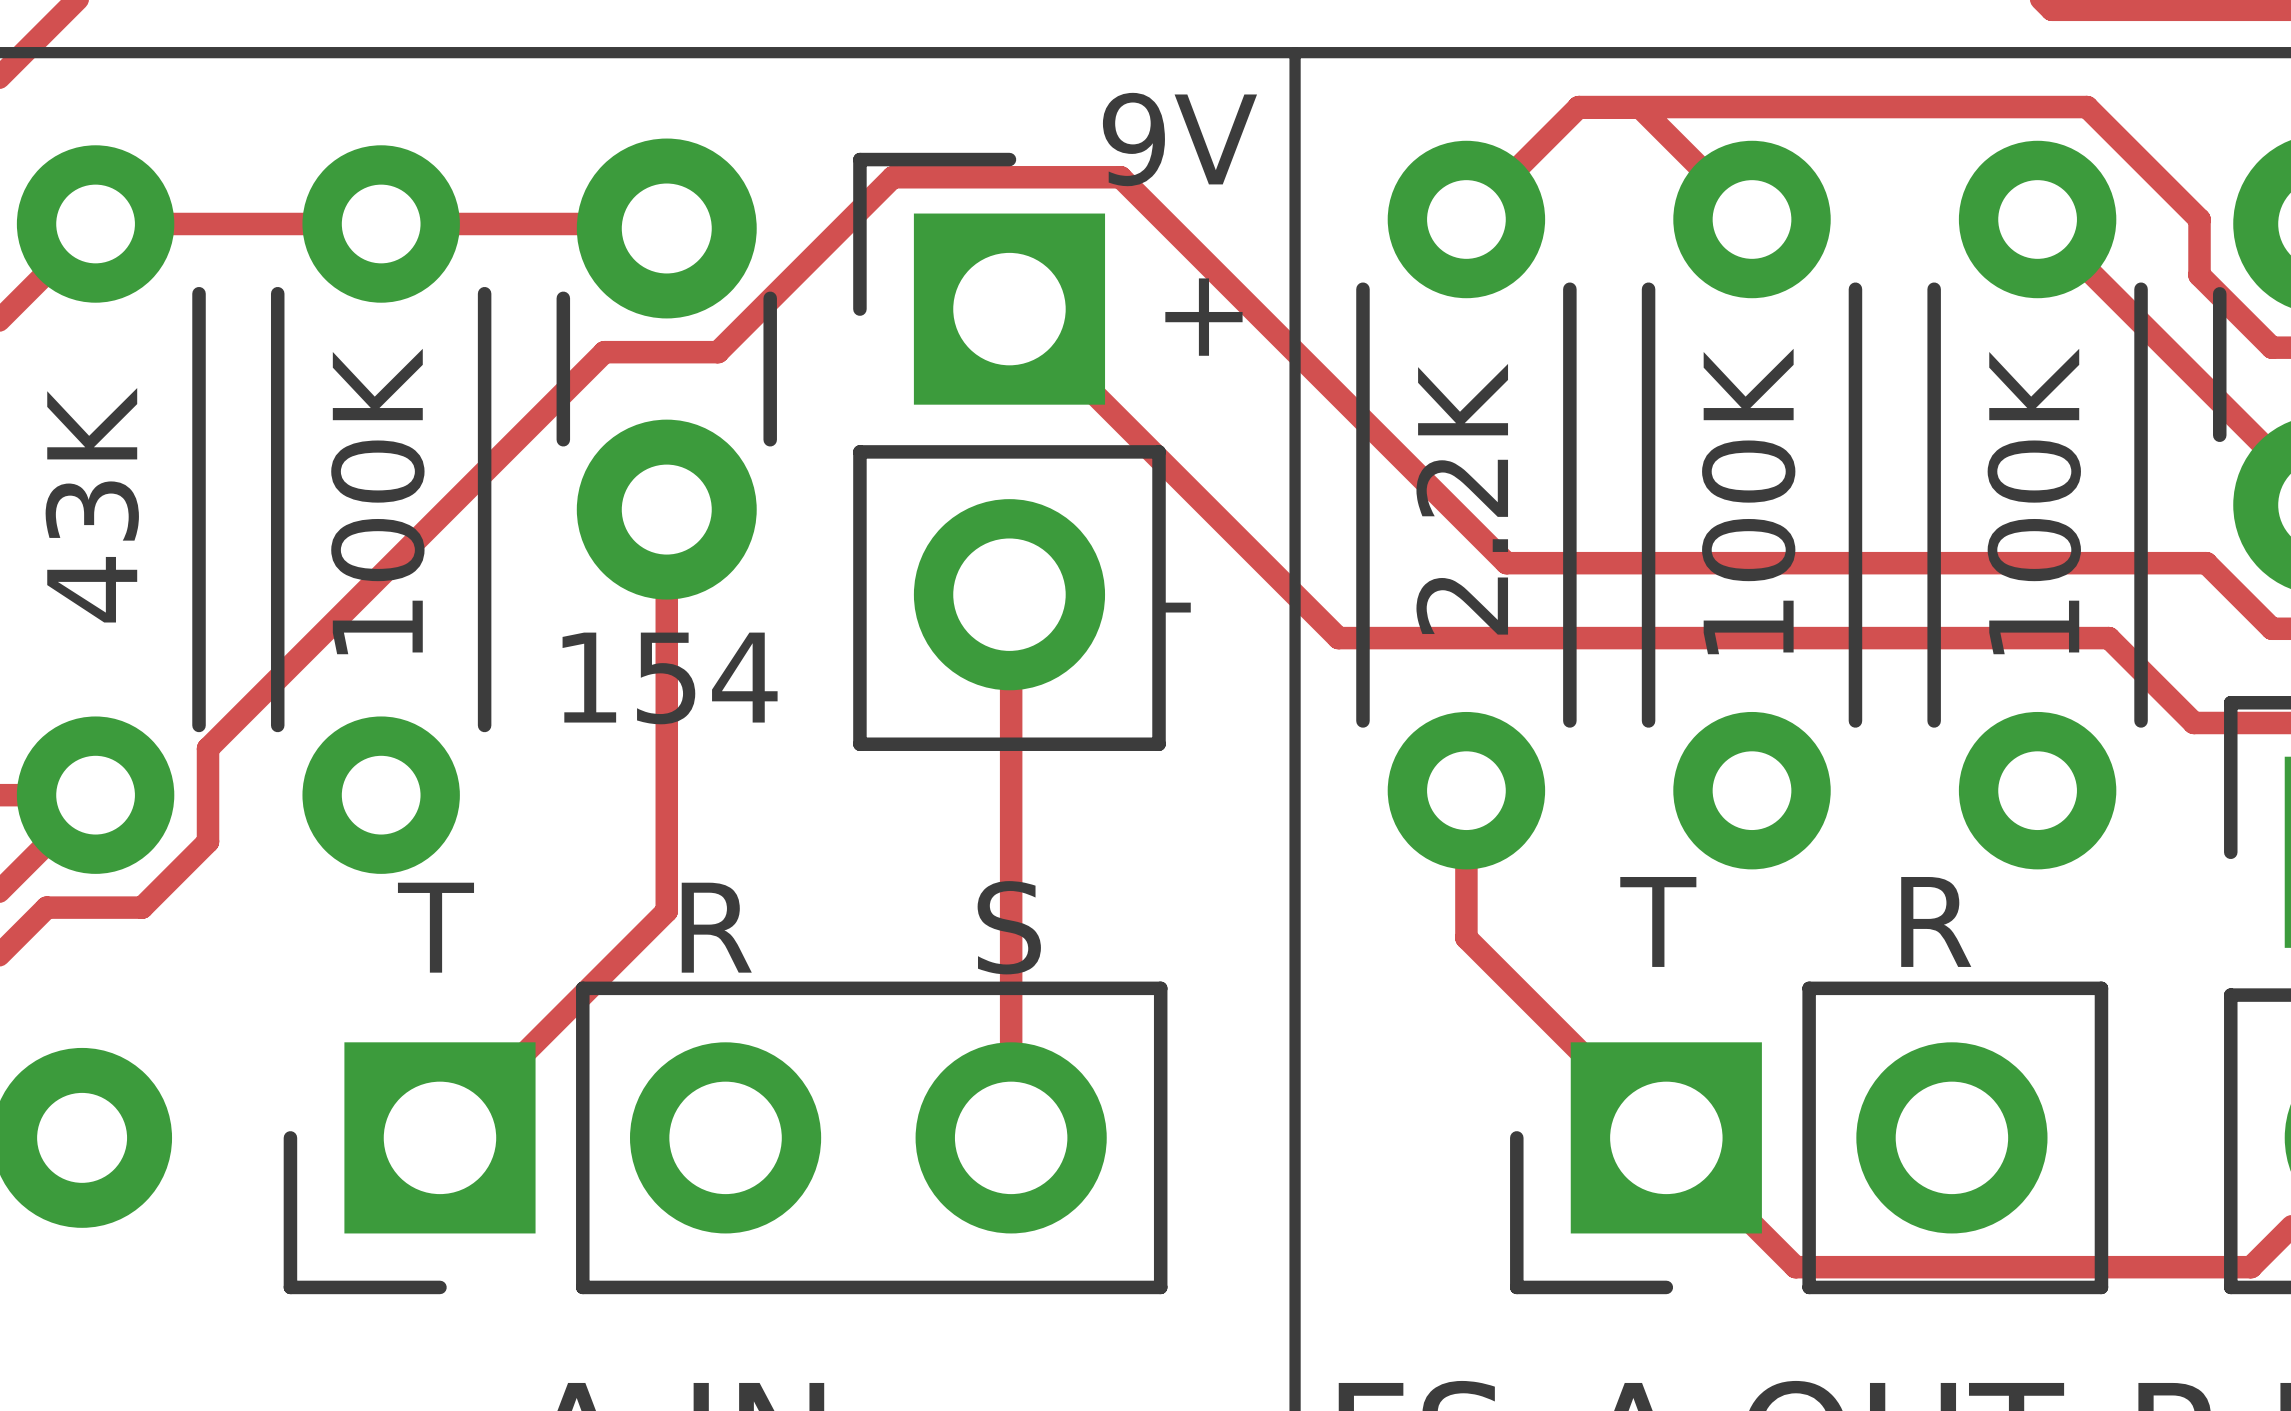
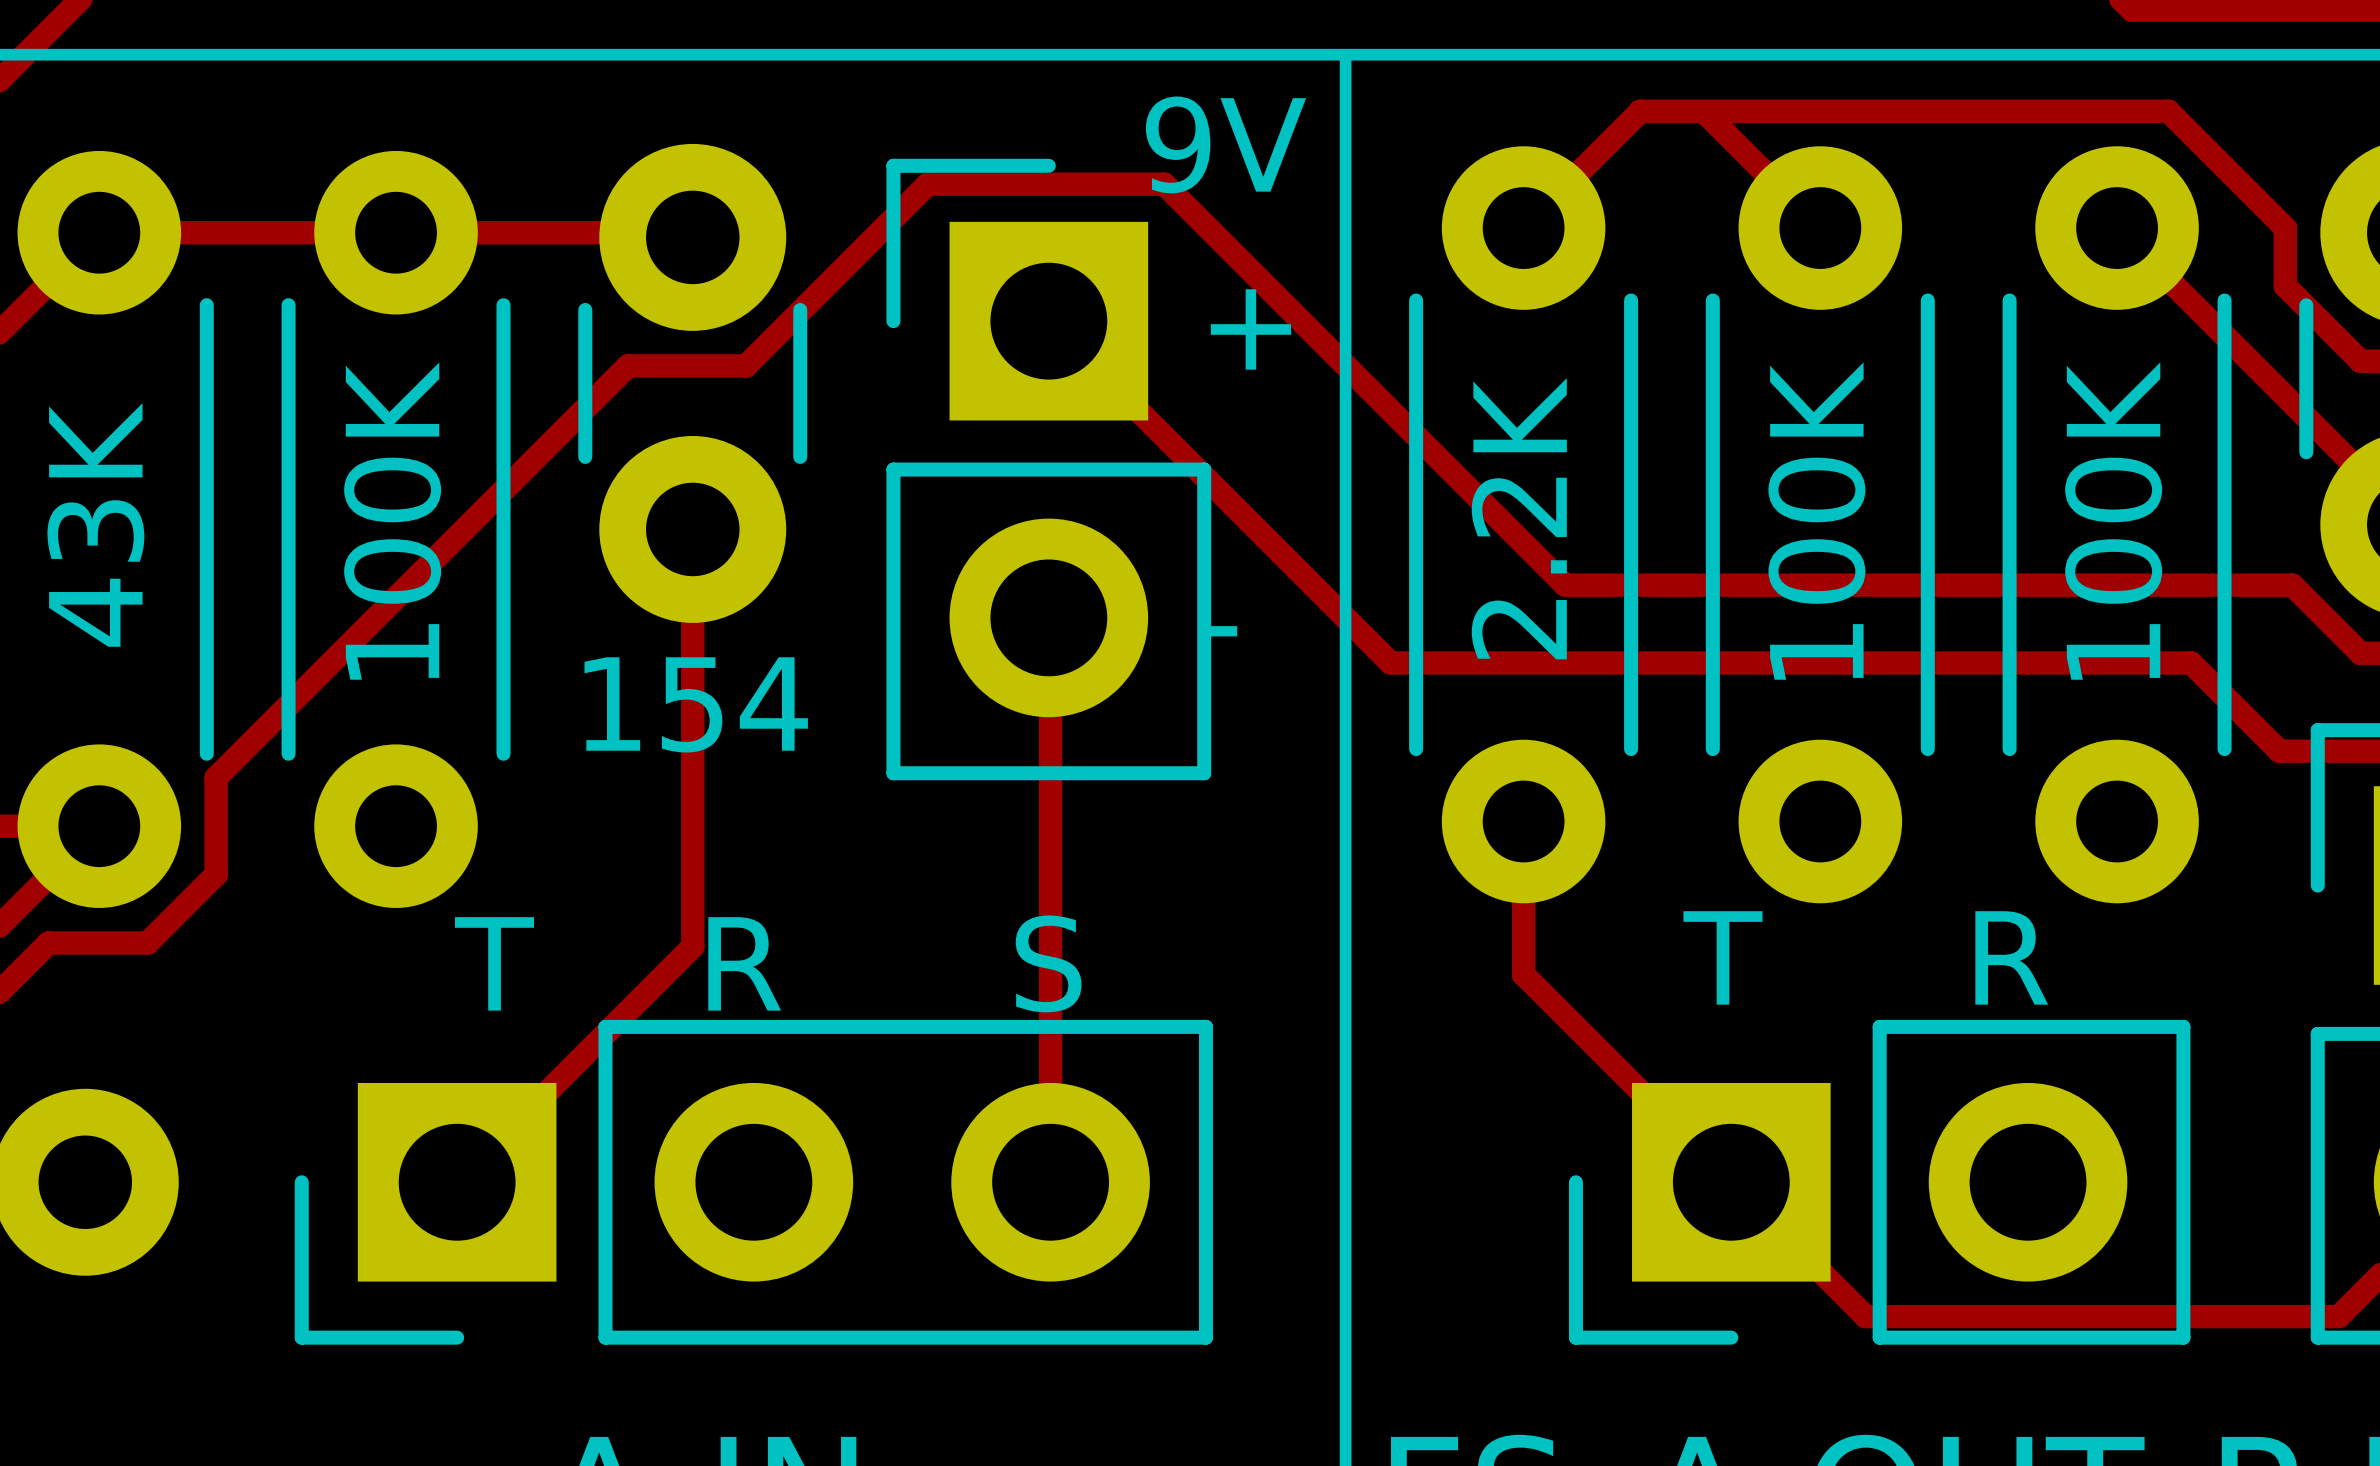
text position: T (435, 927) -> T (494, 963)

